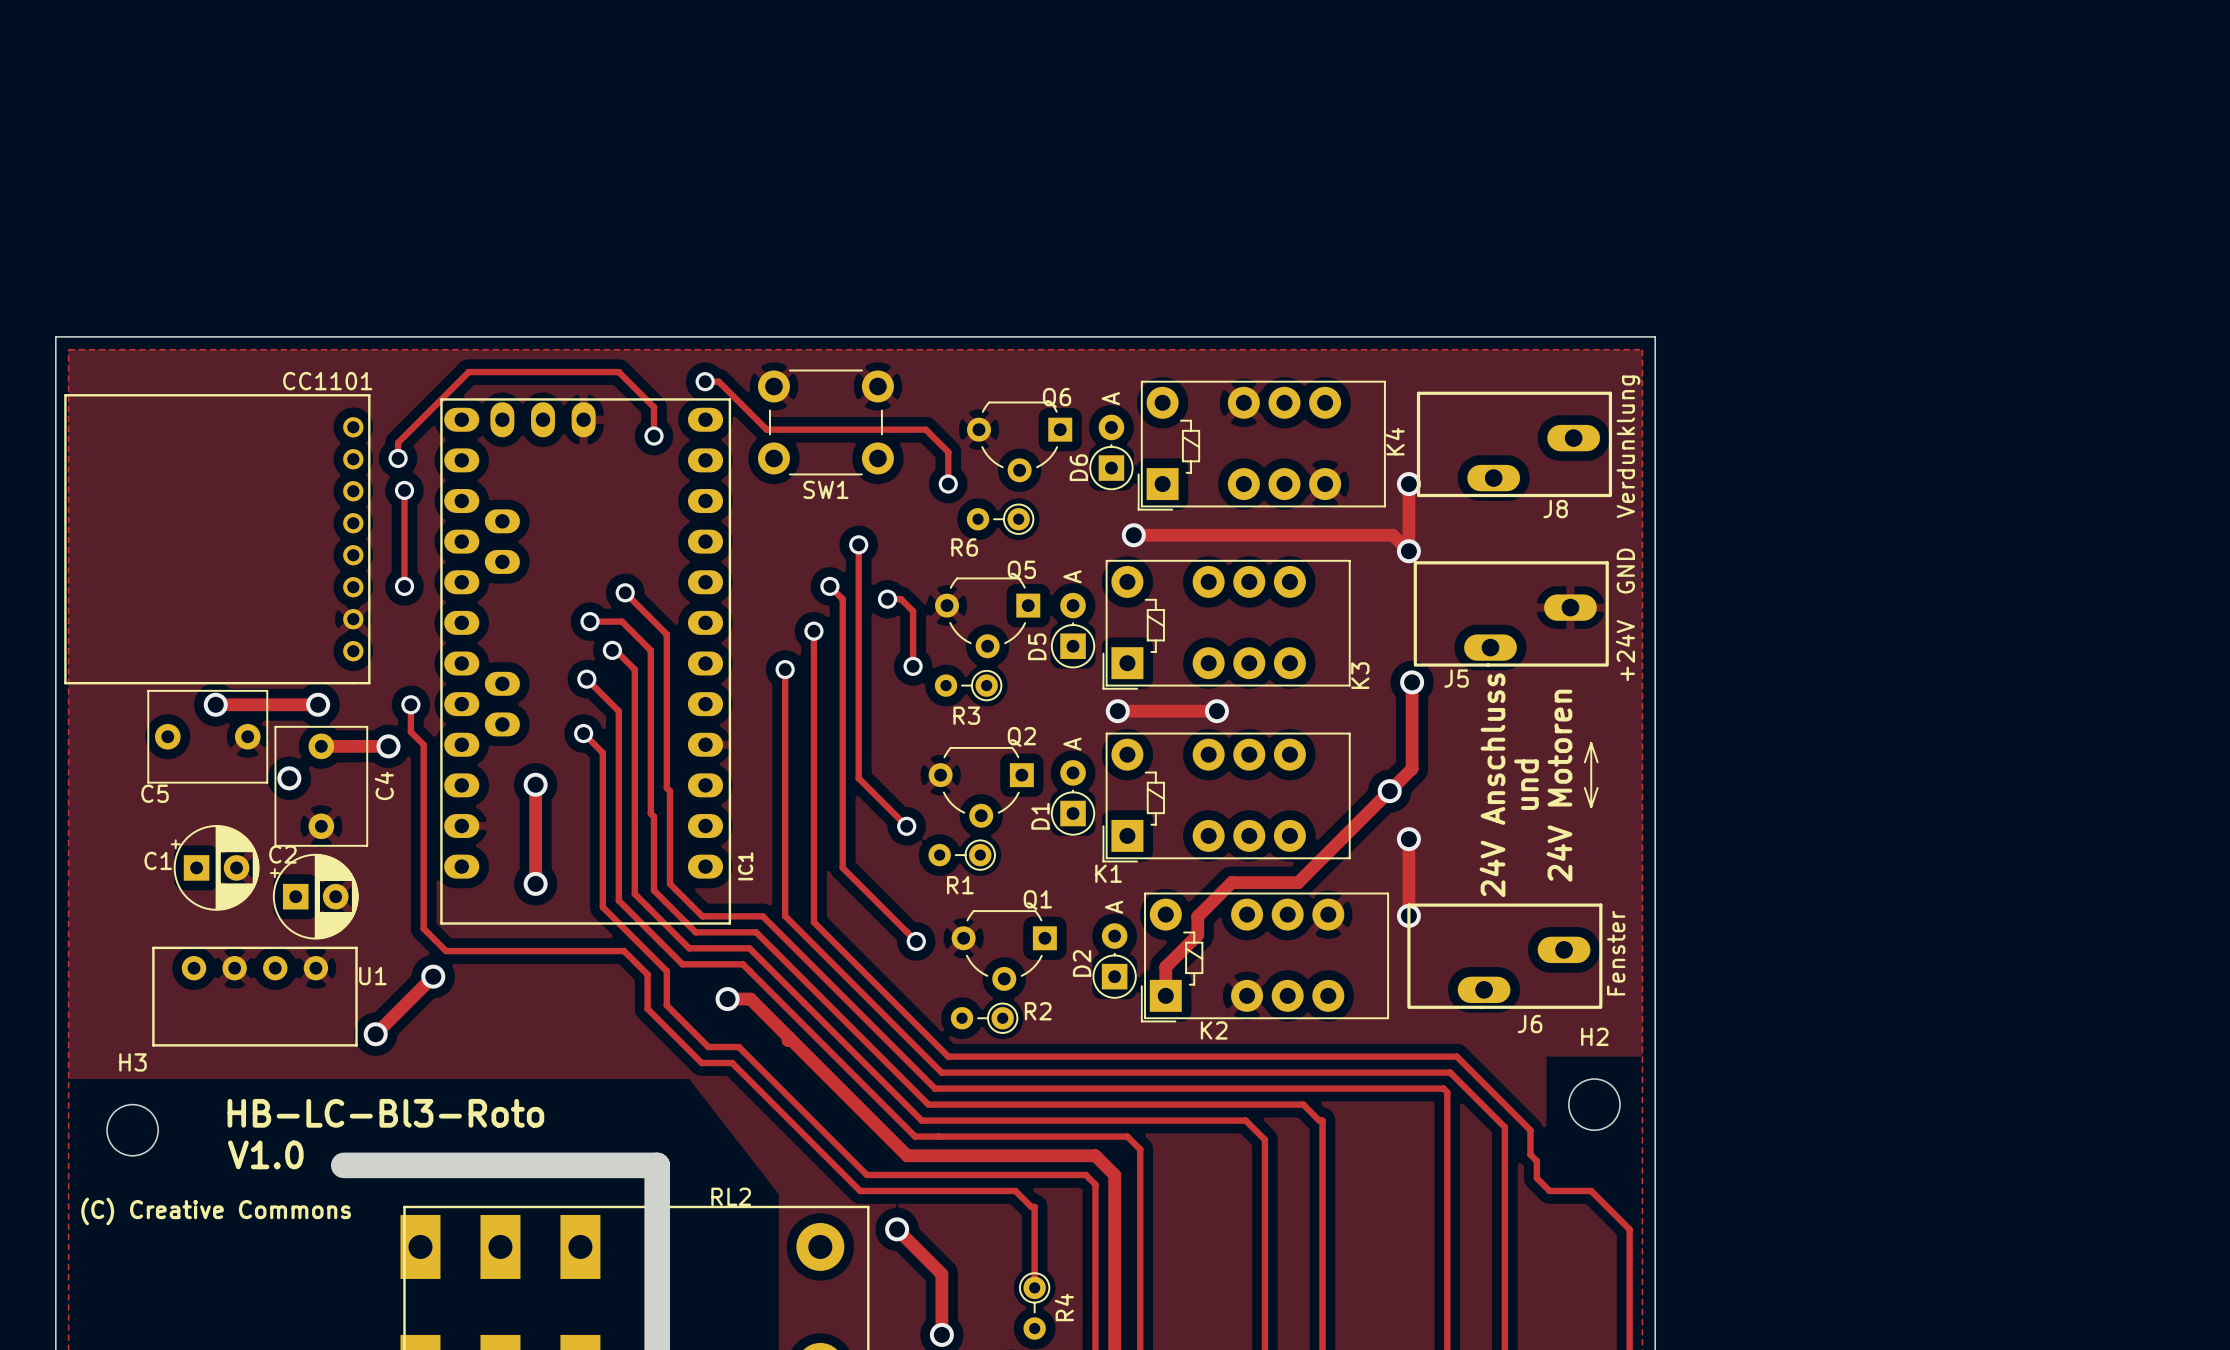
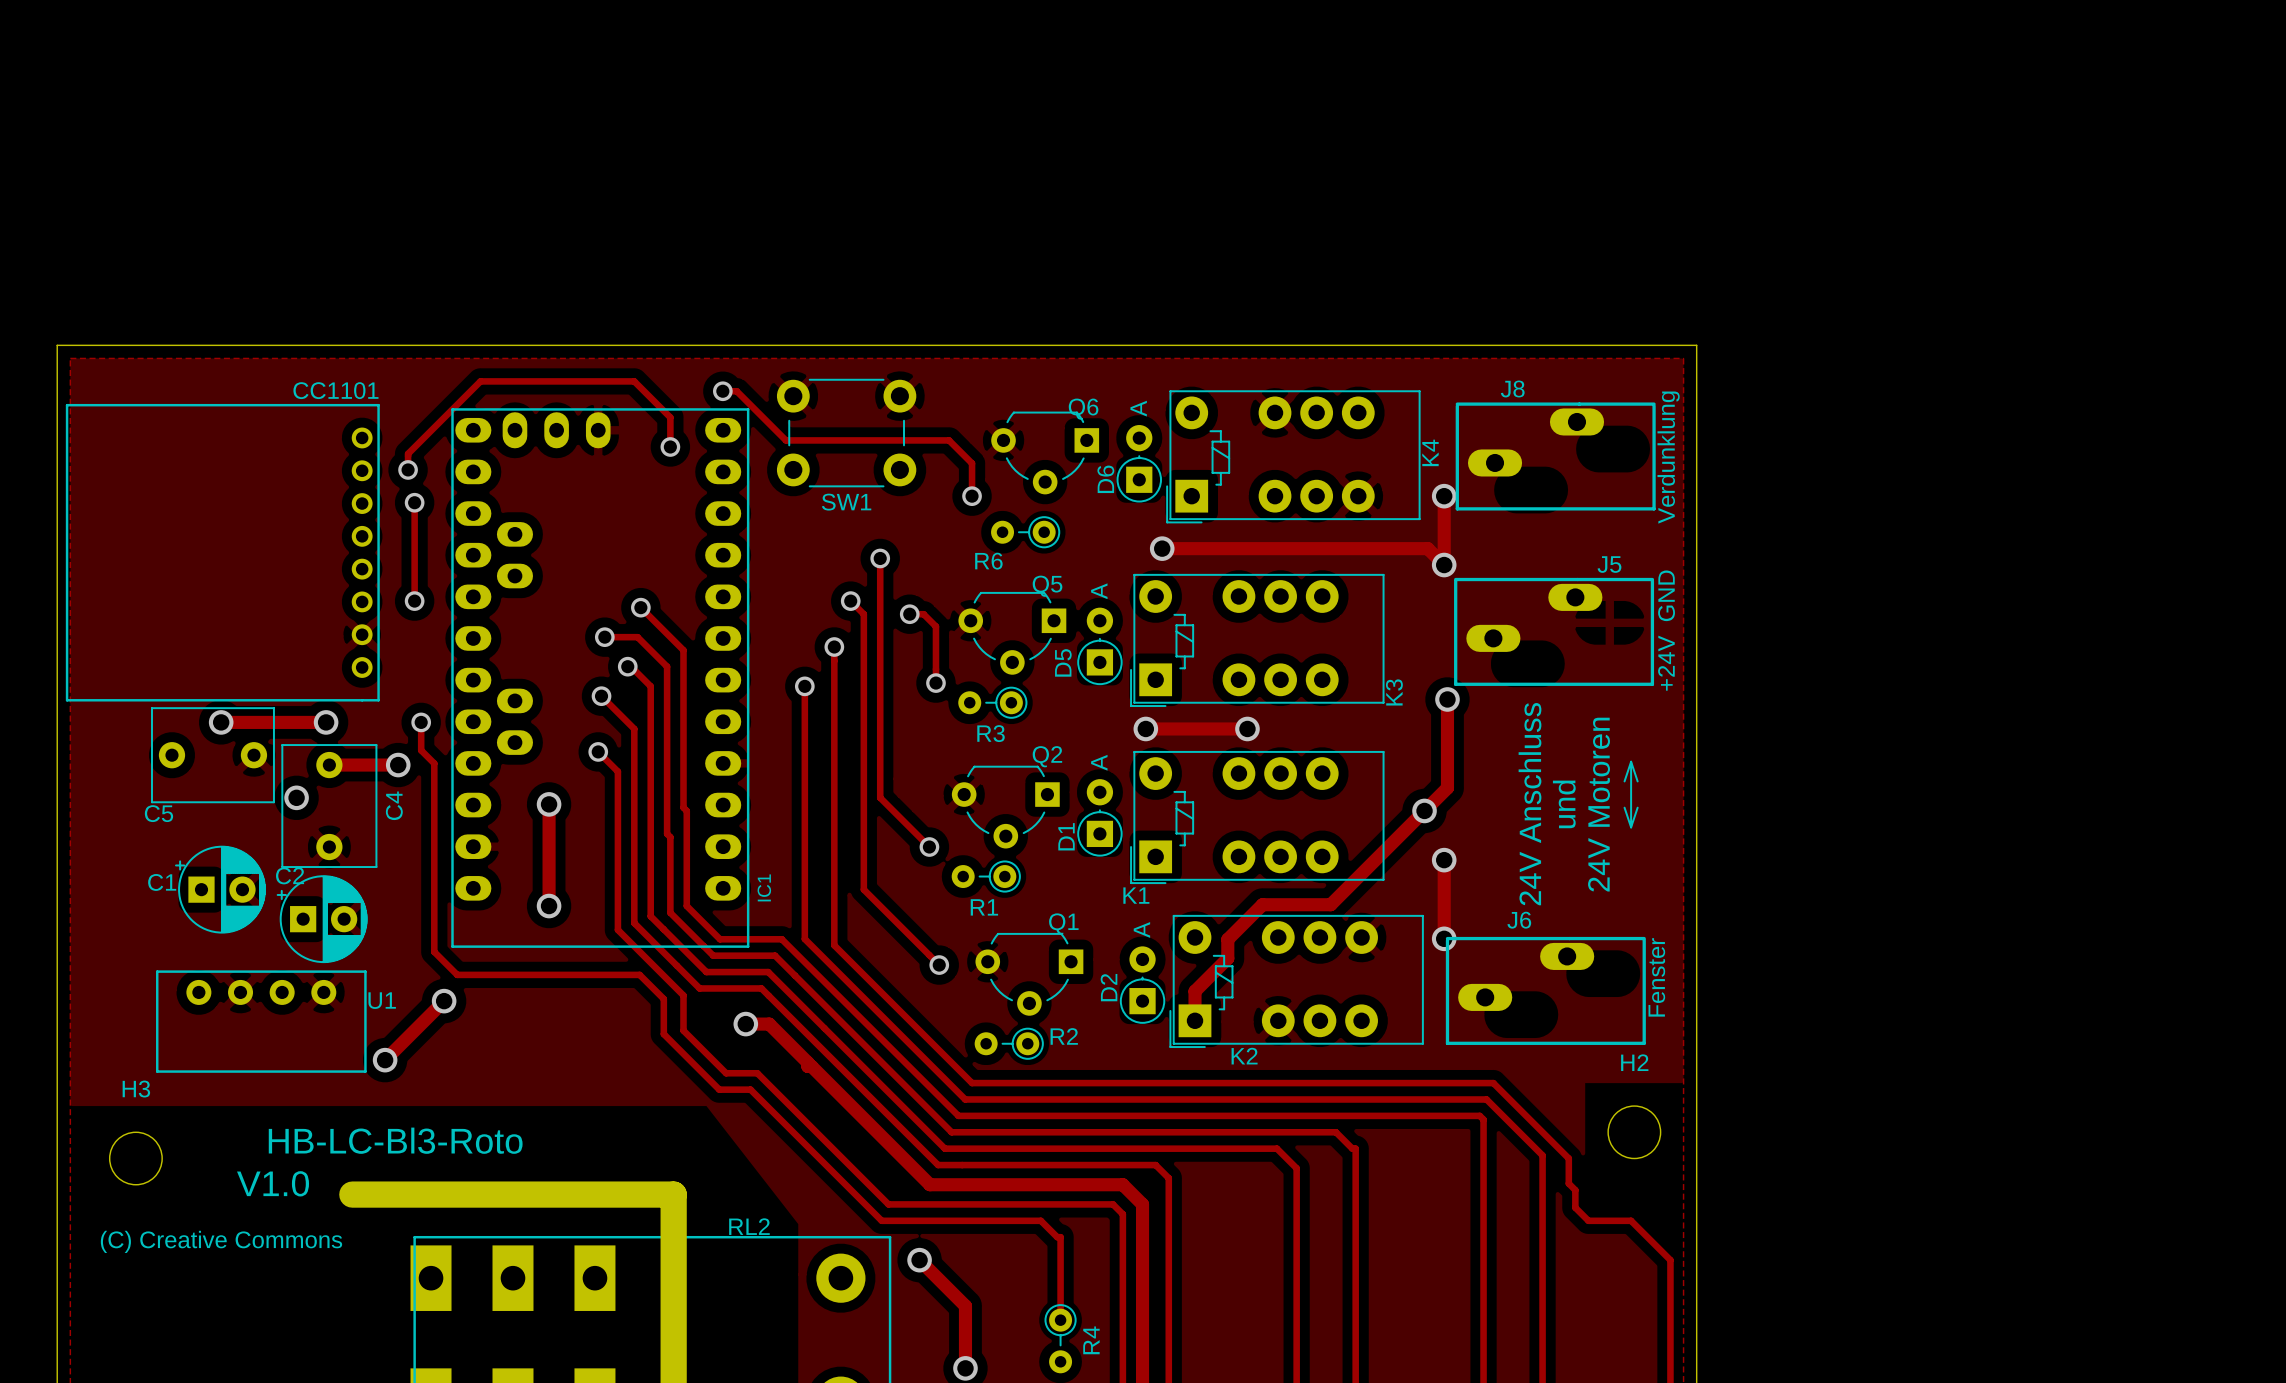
J8 rotation: 0° (1514, 444) -> 180° (1555, 456)
J5 rotation: 0° (1511, 613) -> 180° (1554, 631)
J6 rotation: 0° (1504, 956) -> 180° (1545, 990)

